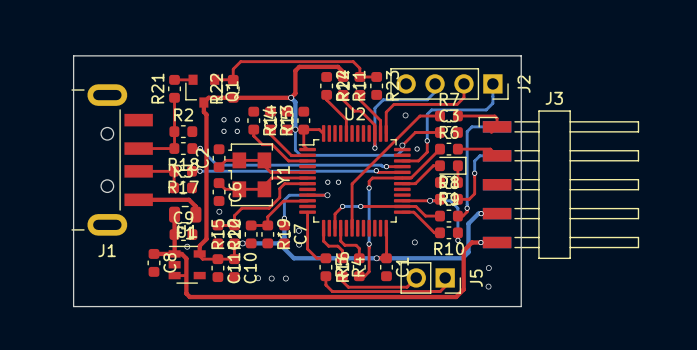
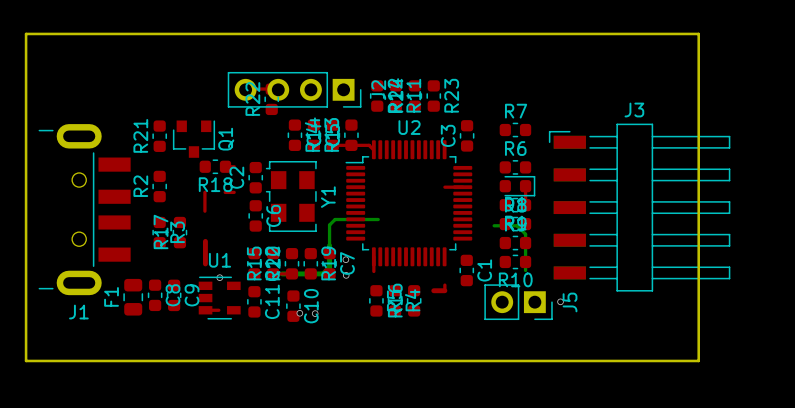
board edge: (73, 55) (521, 55) (521, 306) (73, 306) (73, 55) -> (26, 33) (26, 360) (698, 360) (698, 33) (26, 33)
top track: (343, 76) (343, 71) (337, 66) (299, 66) (295, 70) (295, 93) (291, 97) (208, 97) (203, 102) (203, 111) (206, 114) (206, 239) (199, 245) (199, 256) (202, 259) (234, 259) (234, 243) -> none
top track: (376, 76) (359, 76) (359, 68) (353, 61) (240, 61) (233, 69) (233, 79) -> none
top track: (174, 79) (192, 79) -> none
bottom track: (435, 83) (435, 92) (427, 99) (383, 99) (374, 108) (374, 148) -> none
J2 position: (449, 83) -> (294, 89)
top track: (463, 83) (463, 97) (457, 104) (394, 104) (386, 112) (386, 133) -> none
bottom track: (492, 83) (492, 103) (486, 109) (431, 109) (427, 114) (427, 140) -> none
R21 position: (174, 88) -> (159, 136)
Q1 position: (203, 91) -> (193, 139)
top track: (326, 94) (326, 99) (346, 119) (346, 133) -> none
top track: (343, 94) (343, 99) (354, 111) (360, 111) (374, 125) (374, 148) -> none
top track: (359, 94) (359, 99) (380, 120) (380, 133) -> none
top track: (174, 97) (174, 148) -> none
bottom track: (291, 97) (295, 102) (295, 150) (300, 155) (397, 155) (402, 150) (402, 145) -> none
via: (291, 97) -> none
R2 name position: R2 (183, 114) -> R2 (140, 186)
via: (405, 115) -> none
C3 name position: C3 (448, 115) -> C3 (448, 135)
top track: (439, 116) (420, 116) (352, 183) (352, 228) -> none
top track: (457, 116) (494, 116) (497, 118) (497, 126) (491, 132) -> none
via: (223, 119) -> none
via: (237, 119) -> none
bottom track: (497, 126) (471, 126) (467, 131) (467, 208) -> none
top track: (253, 129) (253, 135) (262, 144) (272, 144) (288, 160) (307, 160) -> none
top track: (270, 129) (270, 134) (291, 155) (307, 155) -> none
via: (295, 129) -> none
top track: (303, 129) (303, 145) (307, 149) -> none
R2 rotation: 0° (183, 131) -> 90° clockwise (159, 186)
R2 position: (183, 131) -> (159, 186)
via: (223, 131) -> none
via: (237, 131) -> none
top track: (439, 132) (415, 132) (402, 145) (402, 149) -> none
C3 rotation: 0° (448, 132) -> 90° clockwise (467, 135)
C3 position: (448, 132) -> (467, 135)
top track: (427, 140) (427, 152) (418, 160) (402, 160) -> none
via: (427, 140) -> none
via: (402, 145) -> none
top track: (138, 148) (174, 148) -> none
bottom track: (200, 148) (217, 165) (386, 166) -> none
via: (200, 148) -> none
via: (374, 148) -> none
via: (417, 148) -> none
top track: (439, 149) (411, 178) (372, 178) (369, 181) (369, 188) -> none
top track: (457, 149) (490, 149) (497, 155) -> none
bottom track: (497, 155) (479, 155) (474, 161) (474, 173) -> none
J1 position: (112, 159) -> (84, 209)
top track: (439, 165) (433, 165) (415, 183) (402, 183) -> none
via: (386, 166) -> none
top track: (219, 167) (225, 160) (264, 160) (264, 165) (270, 172) (307, 172) -> none
top track: (376, 170) (378, 172) (402, 172) -> none
bottom track: (376, 170) (199, 171) -> none
via: (376, 170) -> none
top track: (138, 171) (173, 171) -> none
R17 rotation: 0° (183, 171) -> 90° clockwise (179, 232)
R17 position: (183, 171) -> (179, 232)
via: (199, 171) -> none
top track: (474, 173) (474, 193) (469, 199) (457, 199) -> none
via: (474, 173) -> none
top track: (307, 178) (271, 178) (264, 185) (264, 189) (225, 189) (219, 183) -> none
via: (327, 182) -> none
via: (338, 182) -> none
top track: (307, 183) (284, 183) (279, 188) (279, 197) (269, 208) (241, 208) (234, 215) (234, 225) (217, 225) -> none
R3 rotation: 0° (183, 187) -> 90° clockwise (159, 232)
R3 position: (183, 187) -> (159, 232)
bottom track: (369, 188) (369, 244) -> none
via: (369, 188) -> none
top track: (307, 195) (327, 195) -> none
via: (327, 195) -> none
top track: (138, 199) (188, 199) -> none
top track: (189, 199) (195, 206) (195, 214) -> none
top track: (402, 200) (439, 200) -> none
via: (430, 200) -> none
top track: (307, 201) (283, 201) (267, 216) (267, 225) (251, 225) -> none
top track: (342, 206) (335, 214) (335, 228) -> none
bottom track: (342, 206) (360, 206) -> none
via: (342, 206) -> none
top track: (360, 206) (415, 206) (425, 216) (439, 216) -> none
via: (360, 206) -> none
top track: (467, 208) (467, 211) (462, 216) (457, 216) -> none
via: (467, 208) -> none
via: (219, 211) -> none
top track: (307, 212) (307, 249) (316, 258) (325, 258) -> none
top track: (402, 212) (413, 212) (434, 232) (439, 232) -> none
via: (481, 213) -> none
bottom track: (497, 213) (478, 213) (468, 223) (468, 252) (462, 258) (293, 258) (279, 243) -> none
F1 rotation: 0° (185, 214) -> 90° clockwise (133, 297)
F1 position: (185, 214) -> (133, 297)
via: (284, 218) -> none
top track: (340, 228) (340, 241) (344, 245) (356, 245) (359, 248) (359, 258) -> none
top track: (386, 228) (386, 253) -> none
top track: (174, 234) (174, 253) -> none
C9 rotation: 0° (183, 234) -> 90° clockwise (174, 295)
C9 position: (183, 234) -> (174, 295)
via: (457, 240) -> none
top track: (323, 241) (328, 246) (337, 246) (342, 250) (342, 258) -> none
via: (414, 242) -> none
via: (480, 242) -> none
top track: (497, 242) (471, 242) (463, 250) (463, 289) (456, 297) (189, 297) (186, 293) (186, 258) (181, 253) (154, 253) -> none
via: (242, 243) -> none
top track: (369, 244) (369, 271) (364, 276) (359, 276) -> none
via: (369, 244) -> none
via: (376, 258) -> none
C8 position: (154, 262) -> (155, 295)
C1 position: (386, 267) -> (466, 270)
C10 position: (234, 268) -> (293, 306)
top track: (325, 276) (325, 285) (332, 291) (440, 291) (445, 286) (445, 277) -> none
top track: (342, 276) (342, 281) (348, 287) (407, 287) (416, 277) -> none
J5 position: (430, 277) -> (518, 302)
via: (285, 278) -> none
via: (488, 286) -> none

